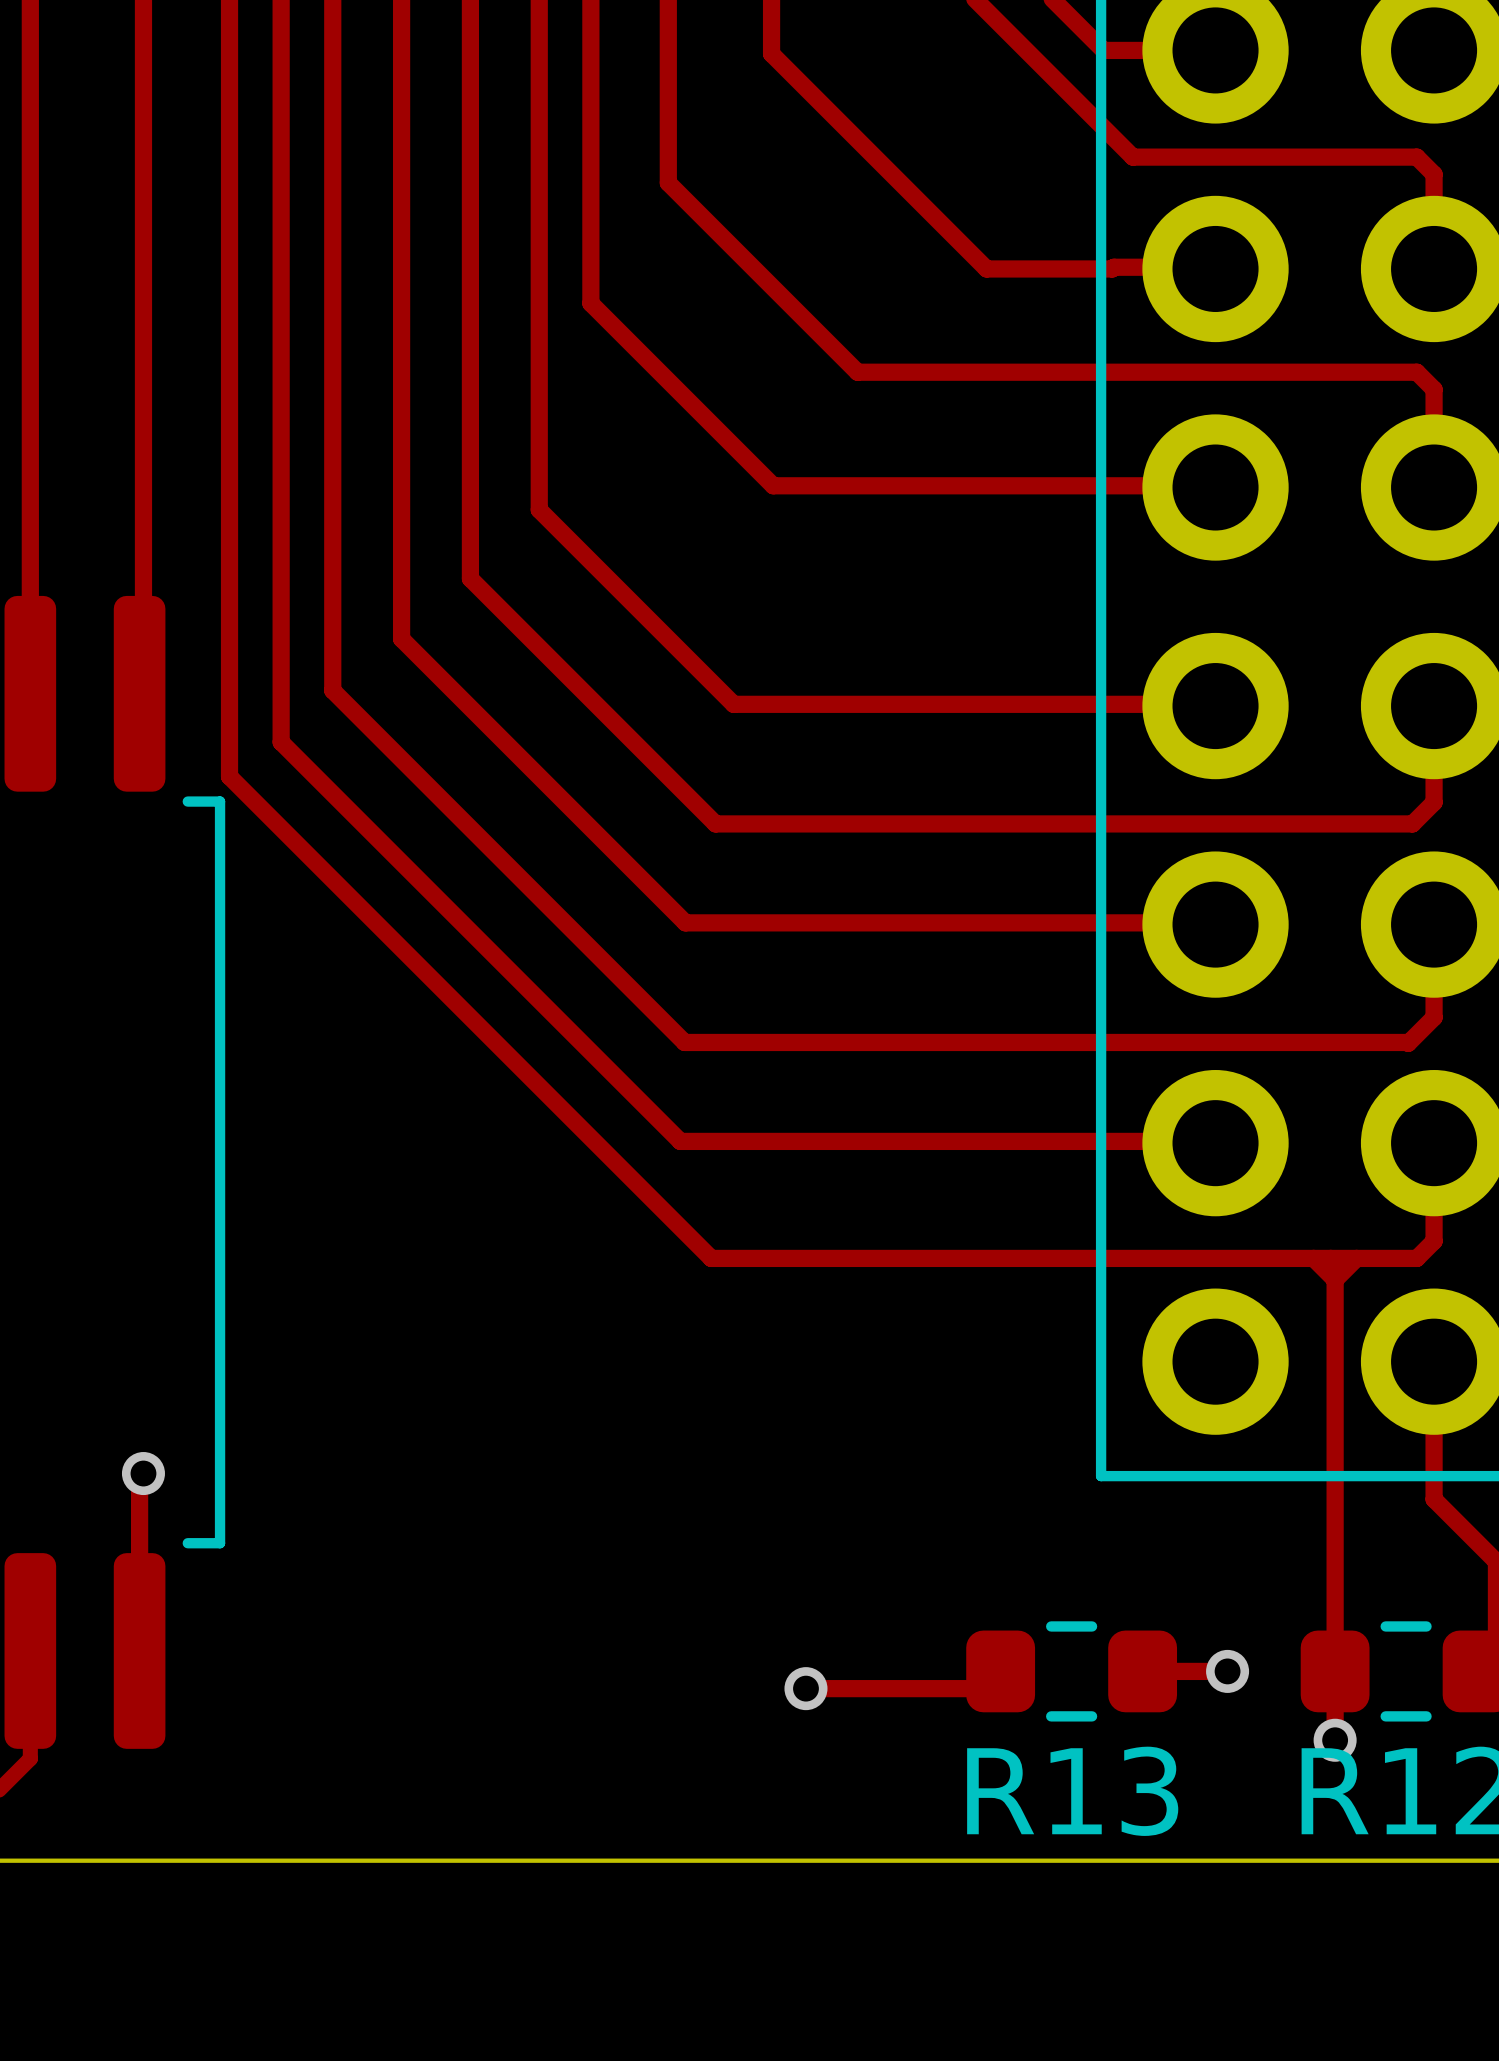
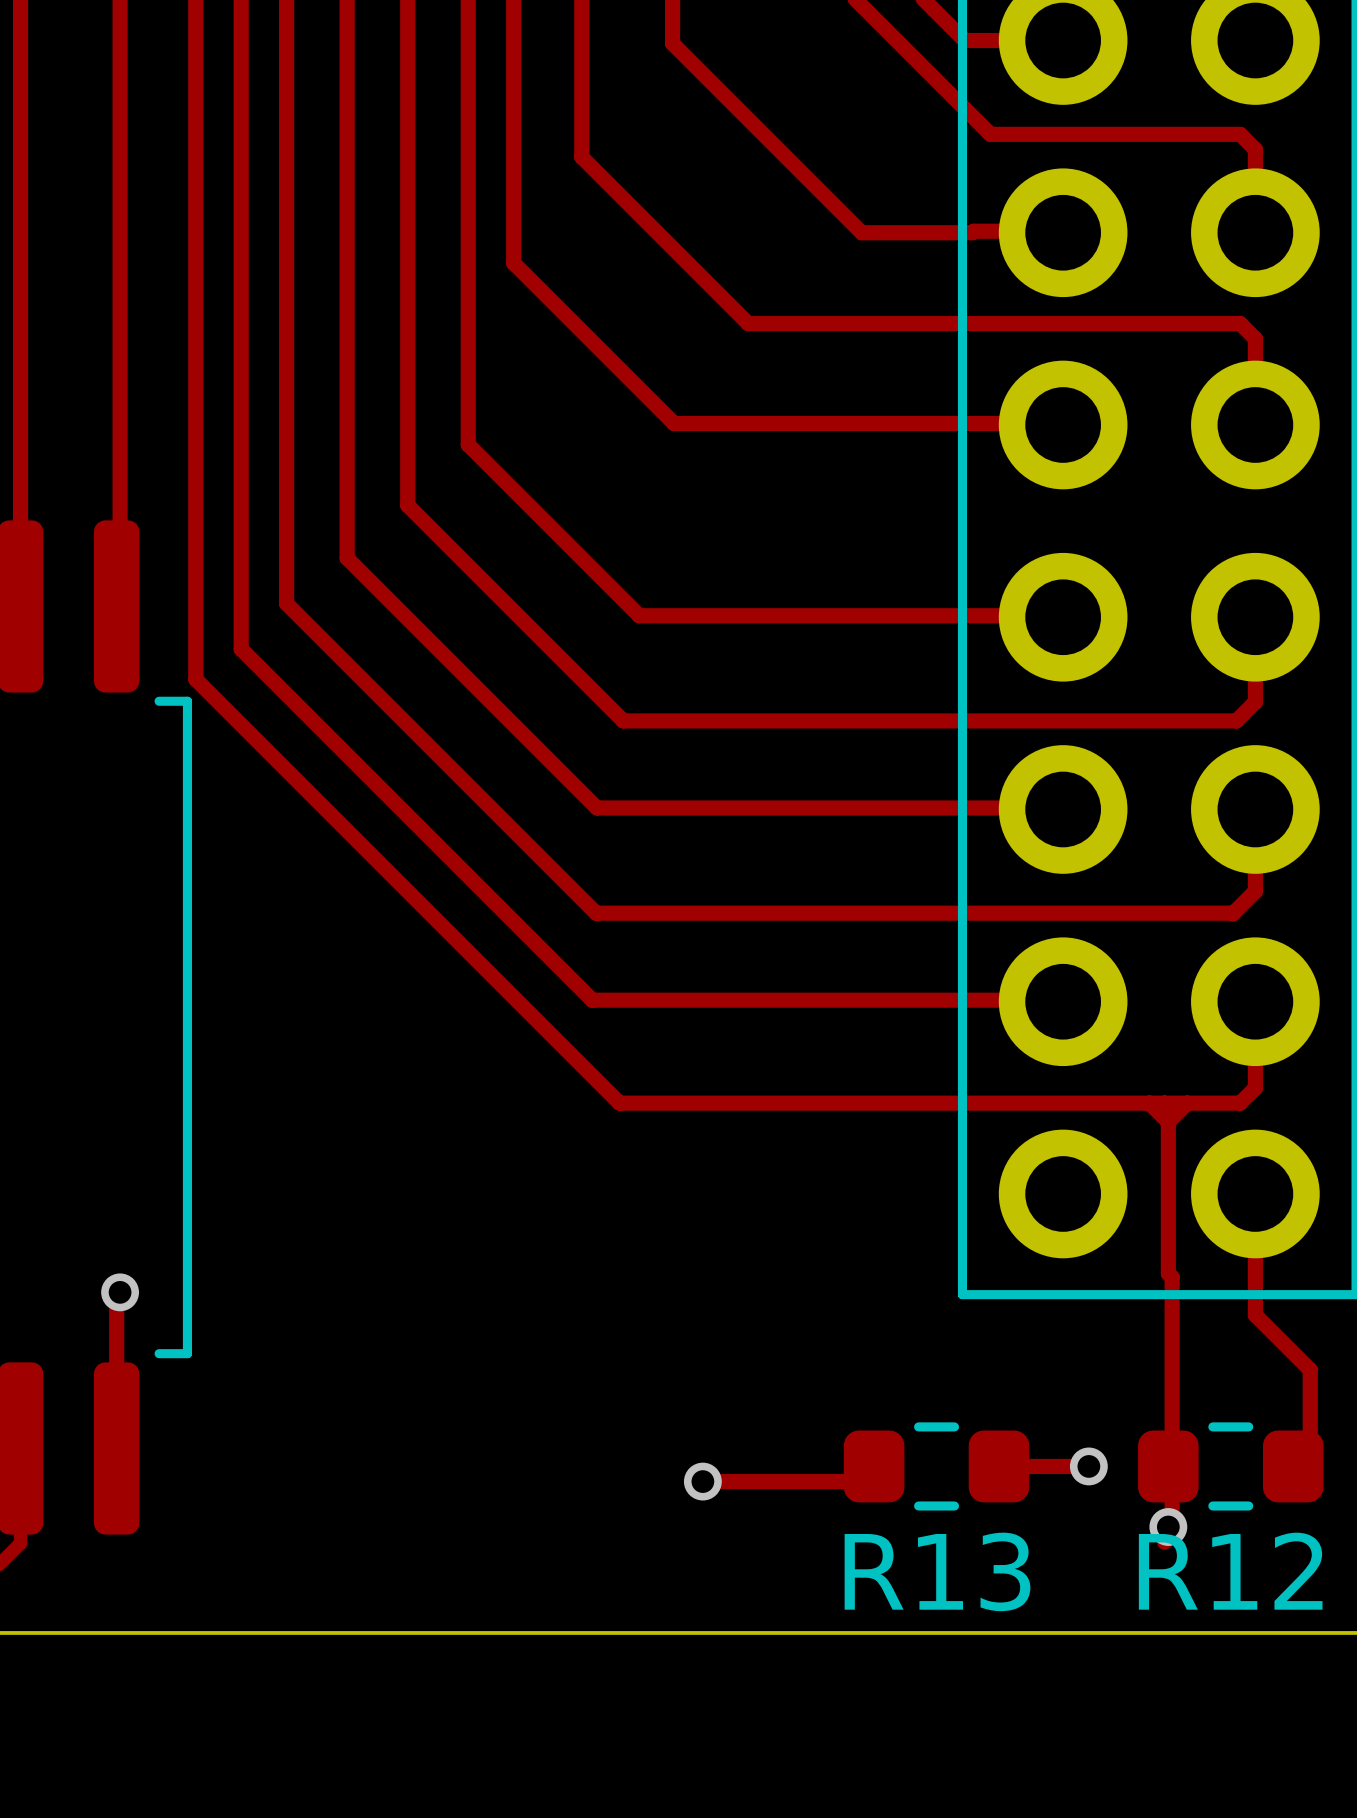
track: (1335, 1452) (1335, 1740) -> (1168, 1273) (1172, 1277) (1172, 1534) (1164, 1542)
via position: (1227, 1671) -> (1088, 1466)

